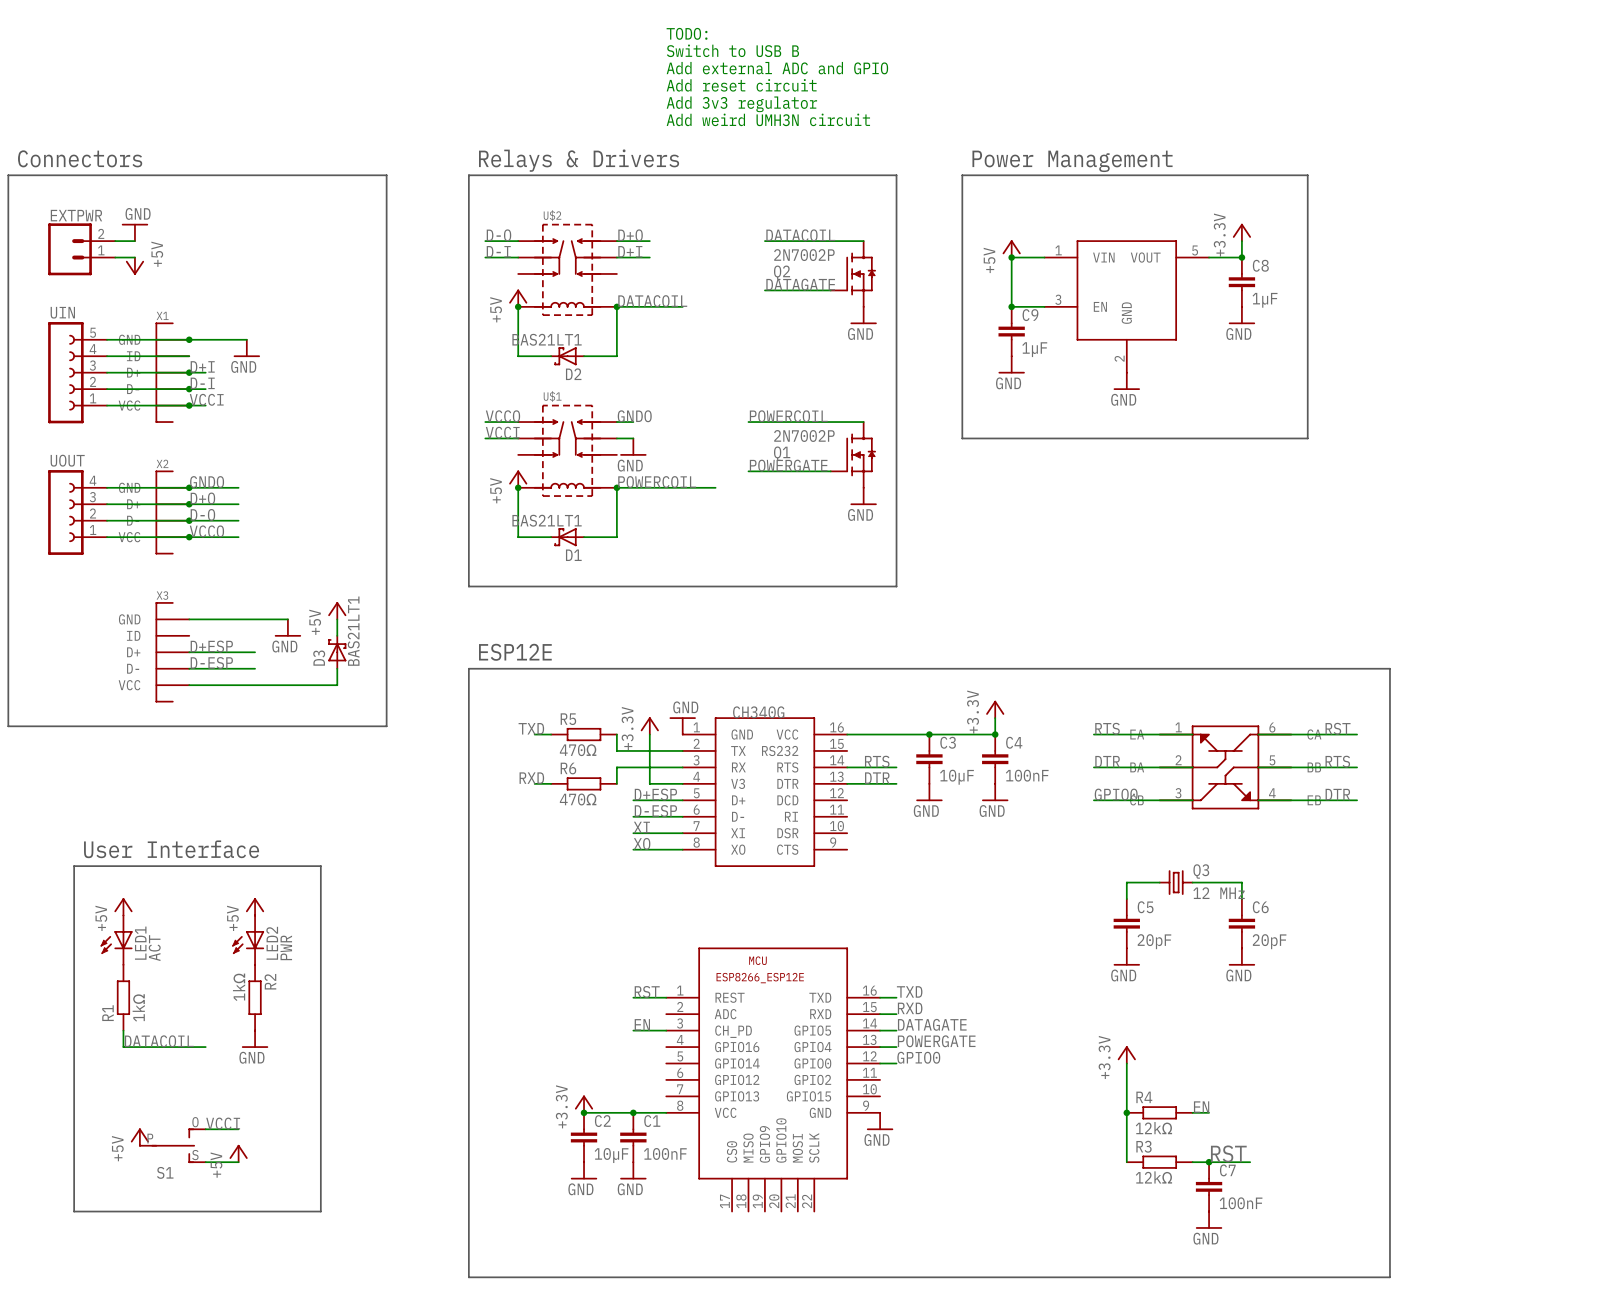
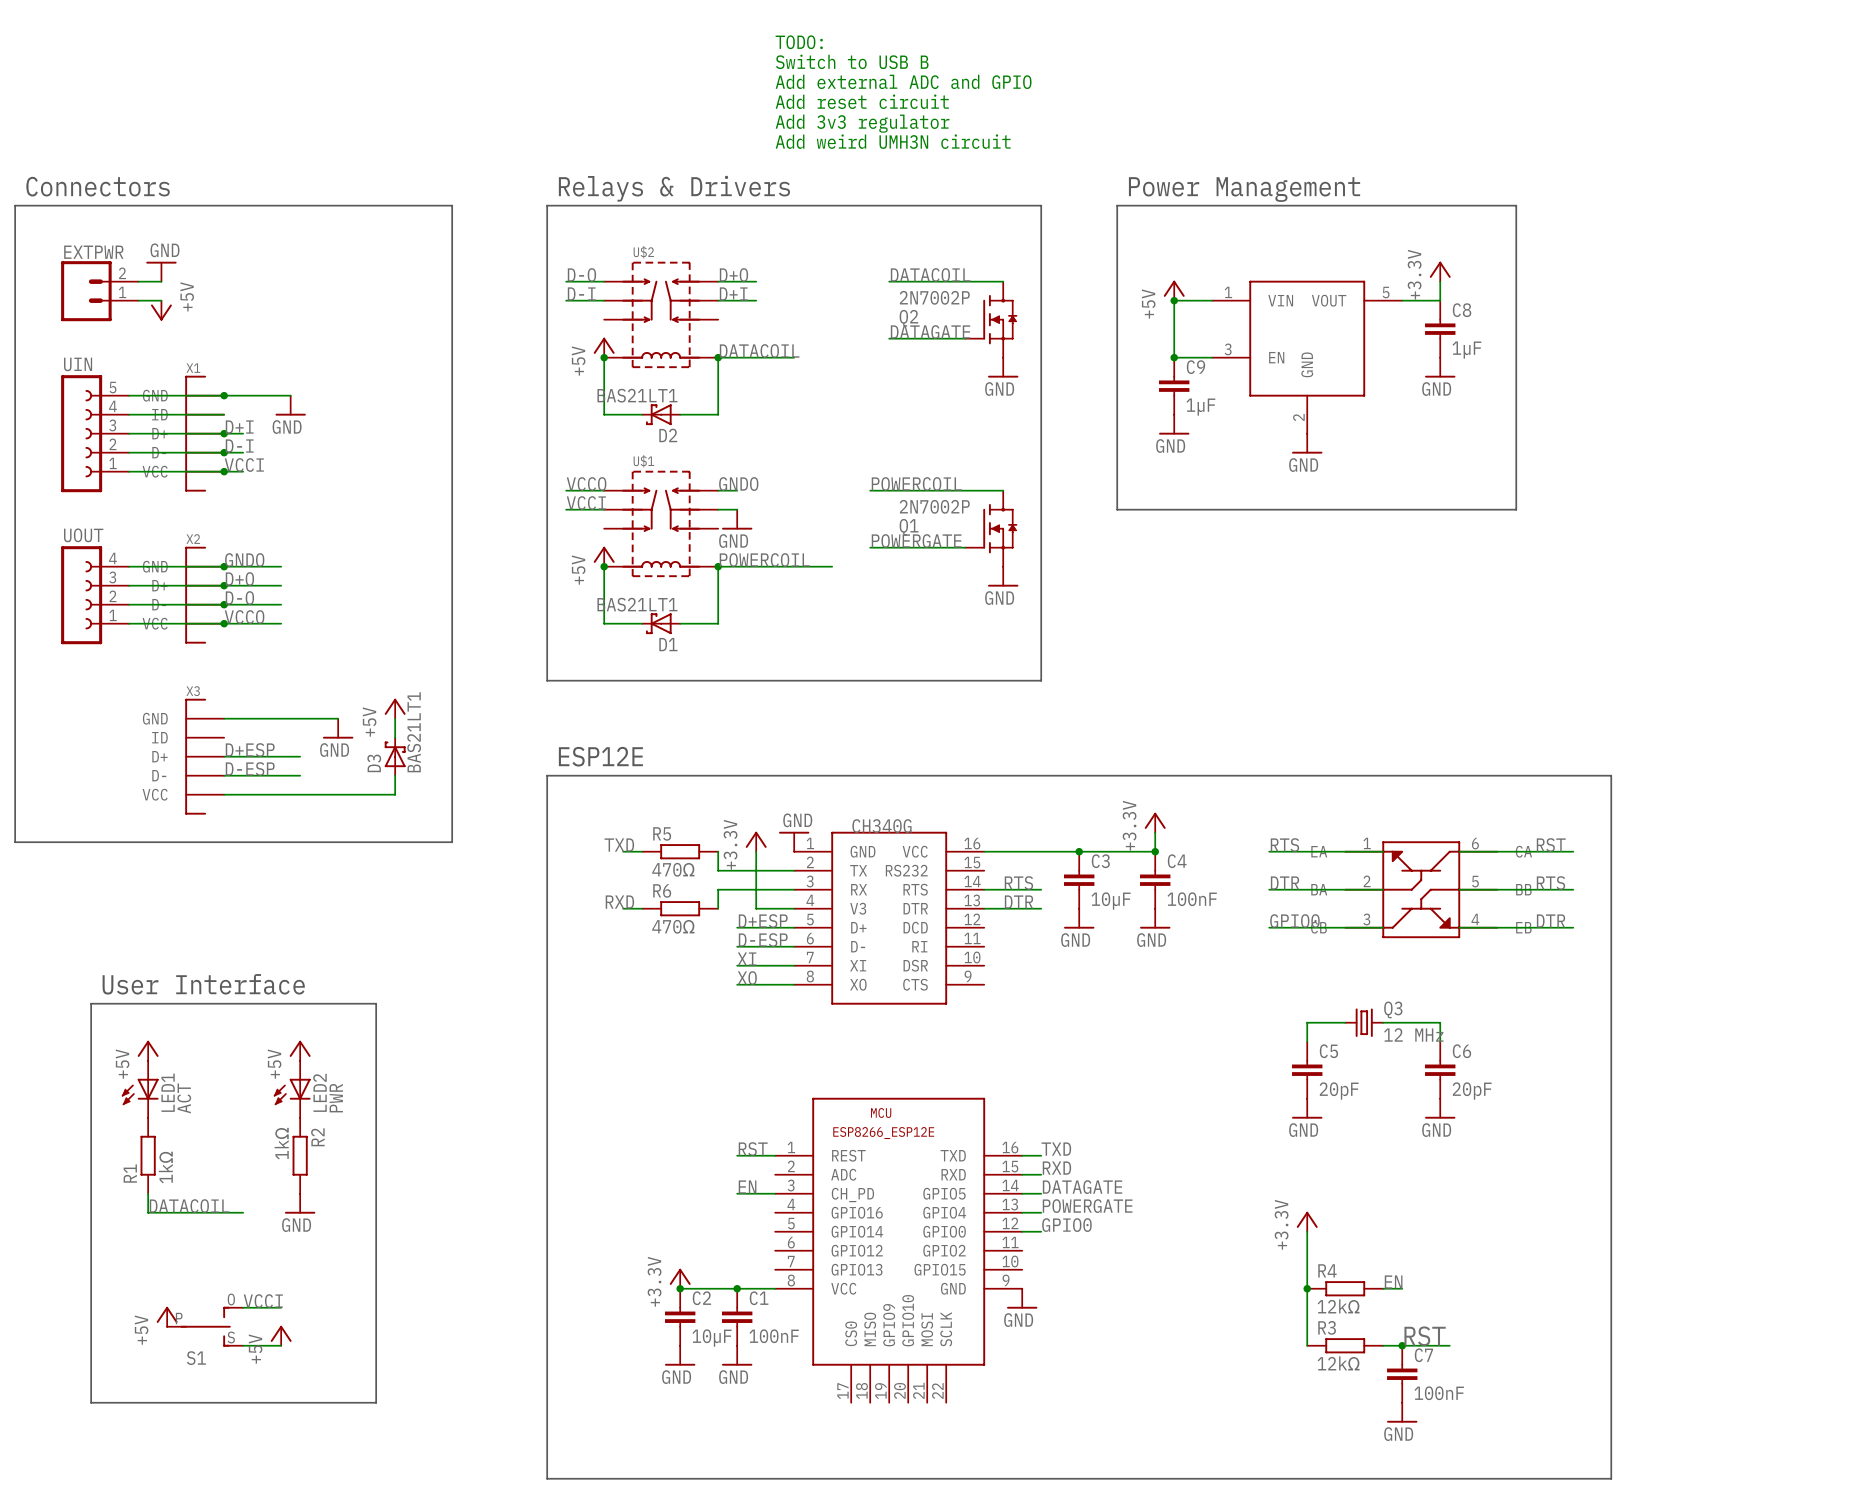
junction: (1241, 257) -> none

